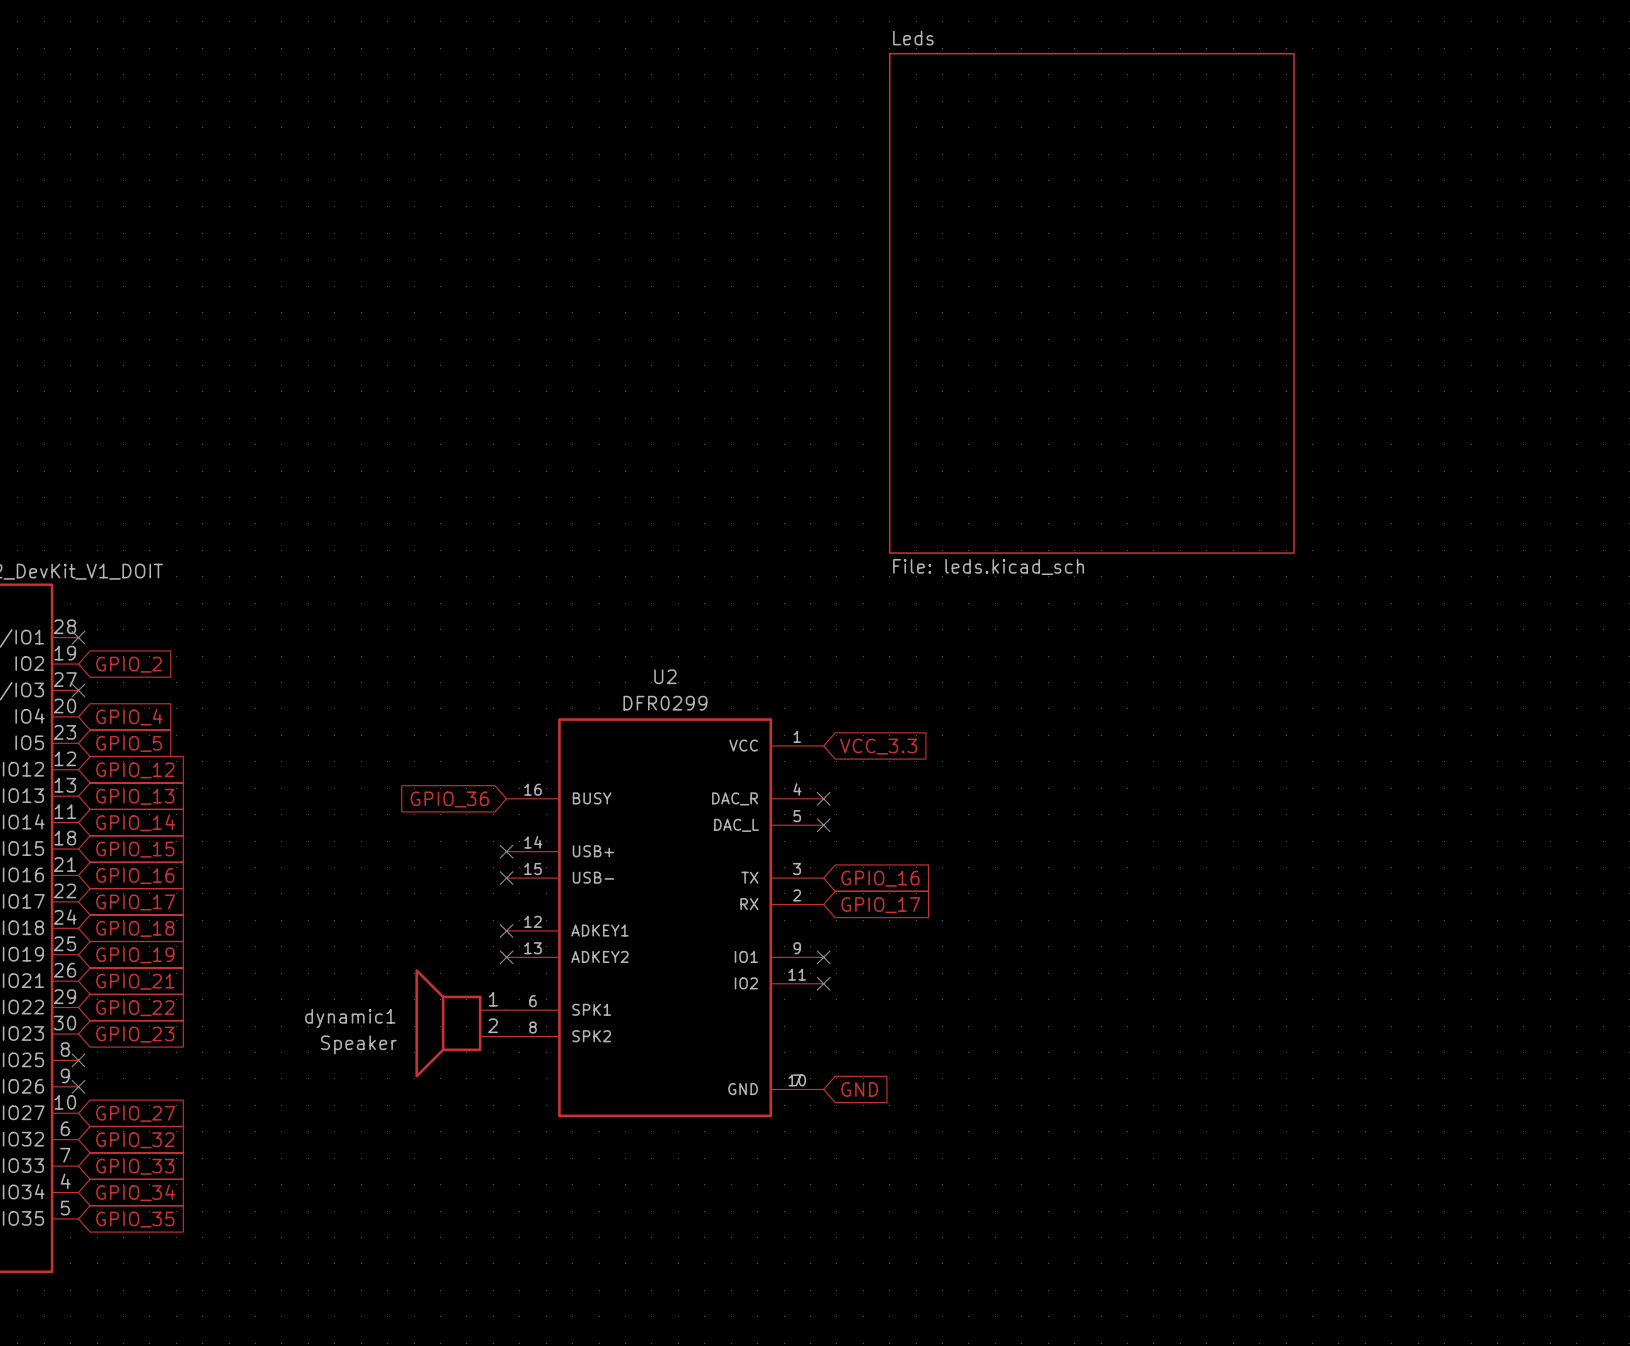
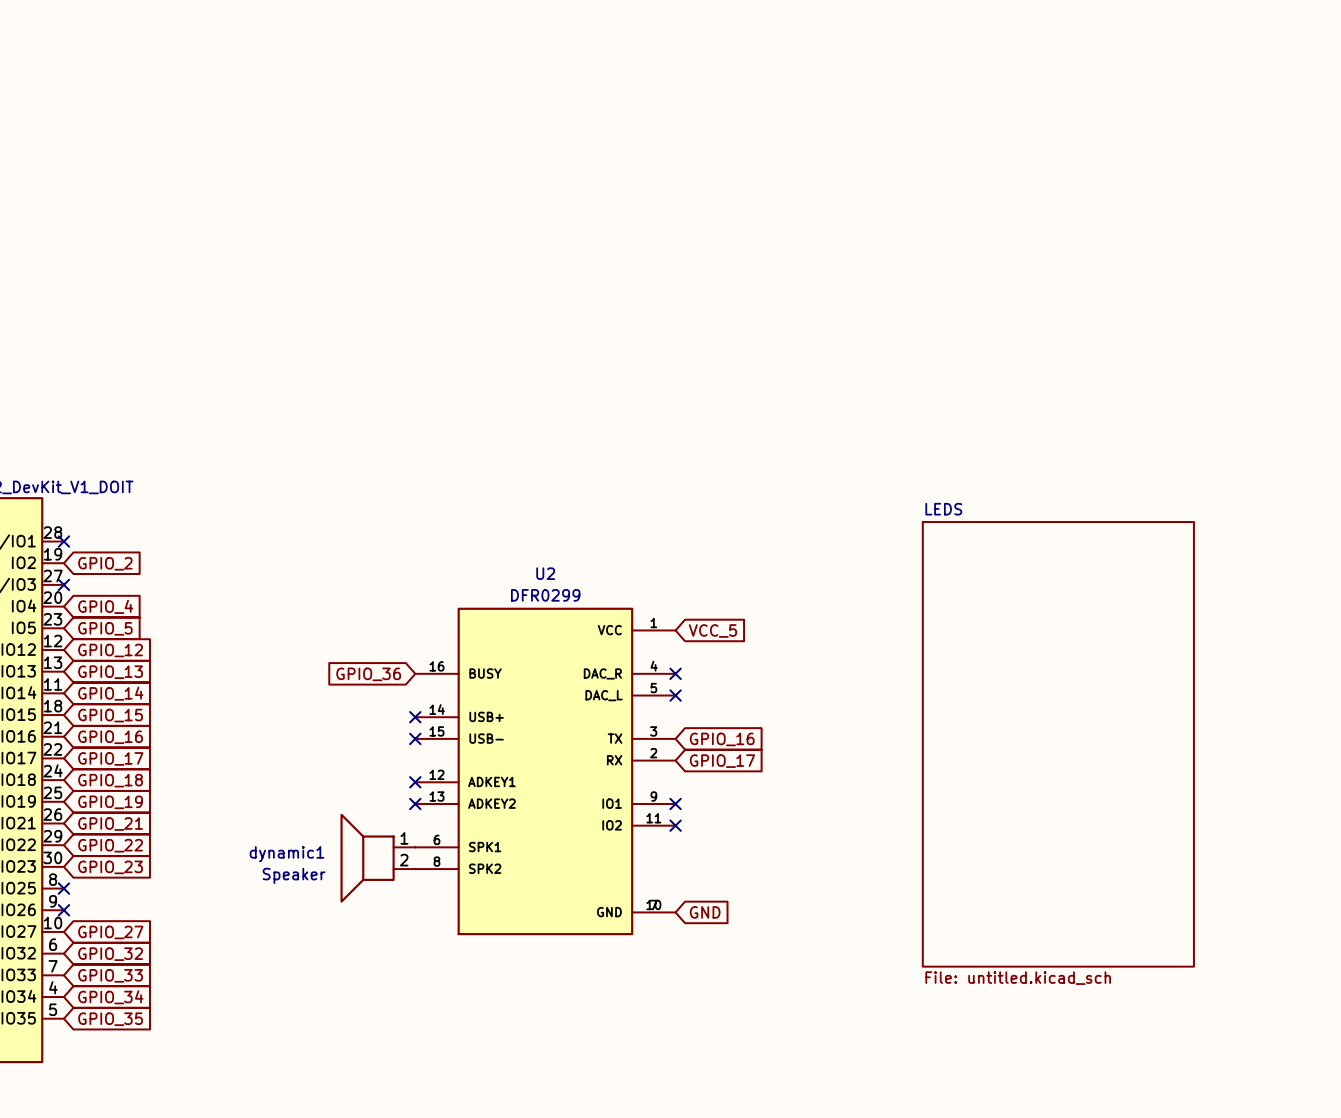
sheet Leds: File: leds.kicad_sch (1091, 303) -> none
global label: VCC_3.3 (878, 746) -> VCC_5 (712, 630)
sheet LEDS: none -> File: untitled.kicad_sch (1058, 744)

